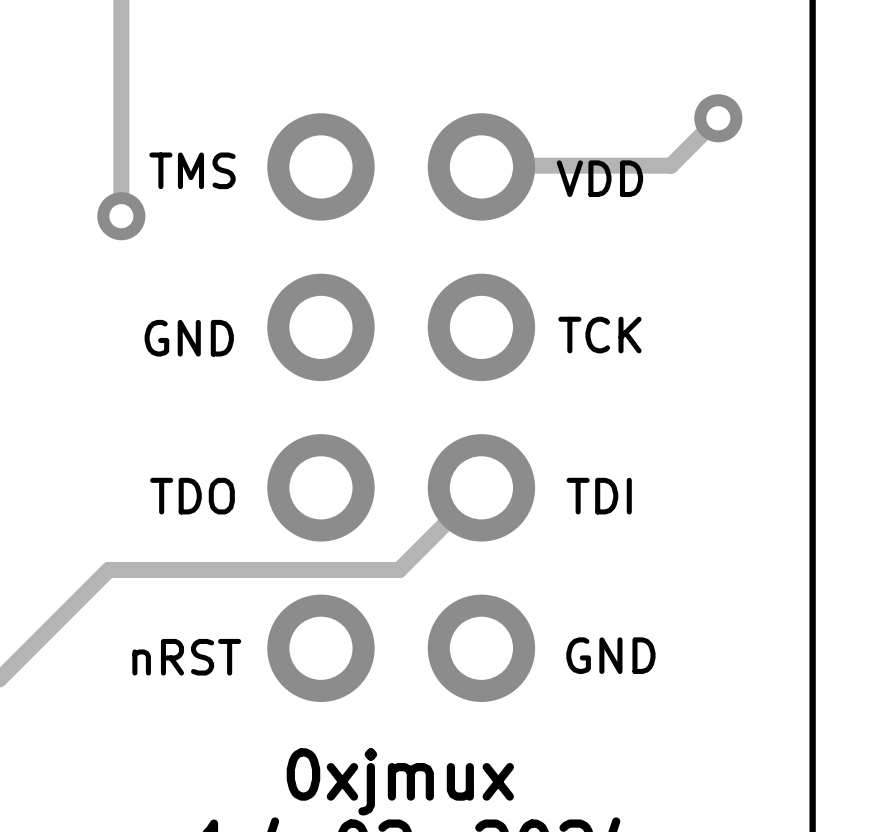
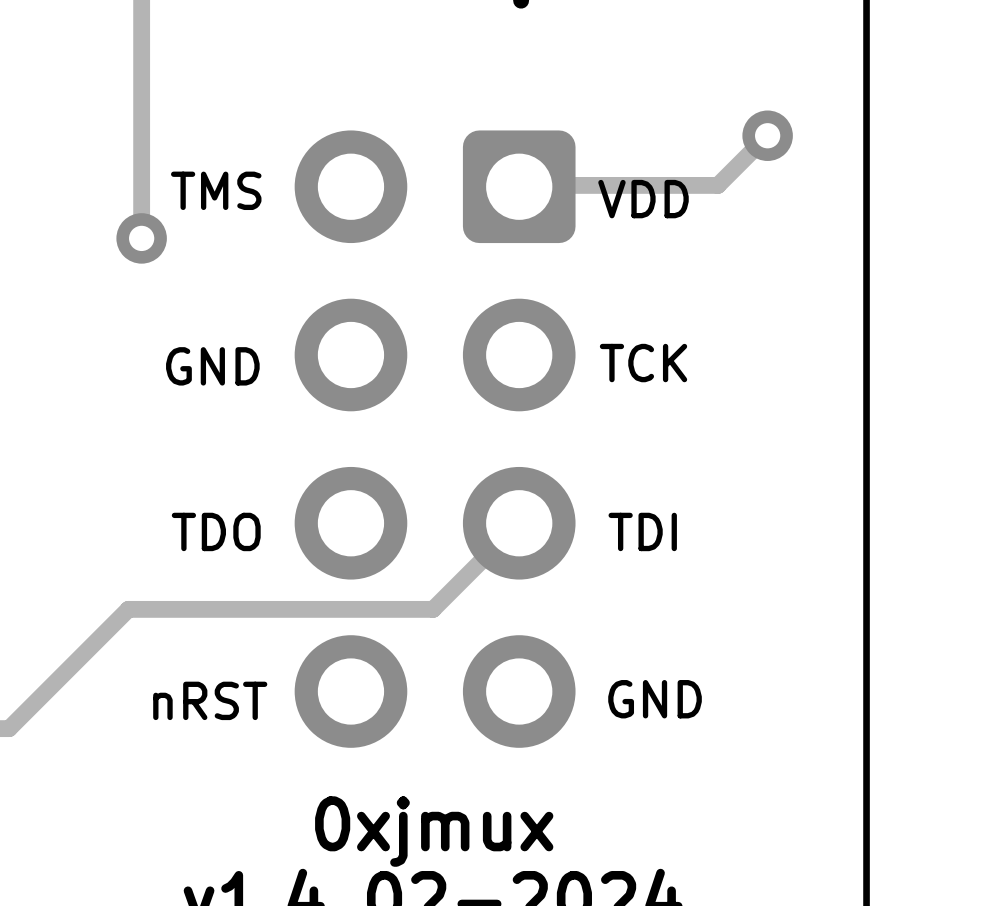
part footprint: [267, 113, 536, 703] -> [294, 130, 576, 748]

